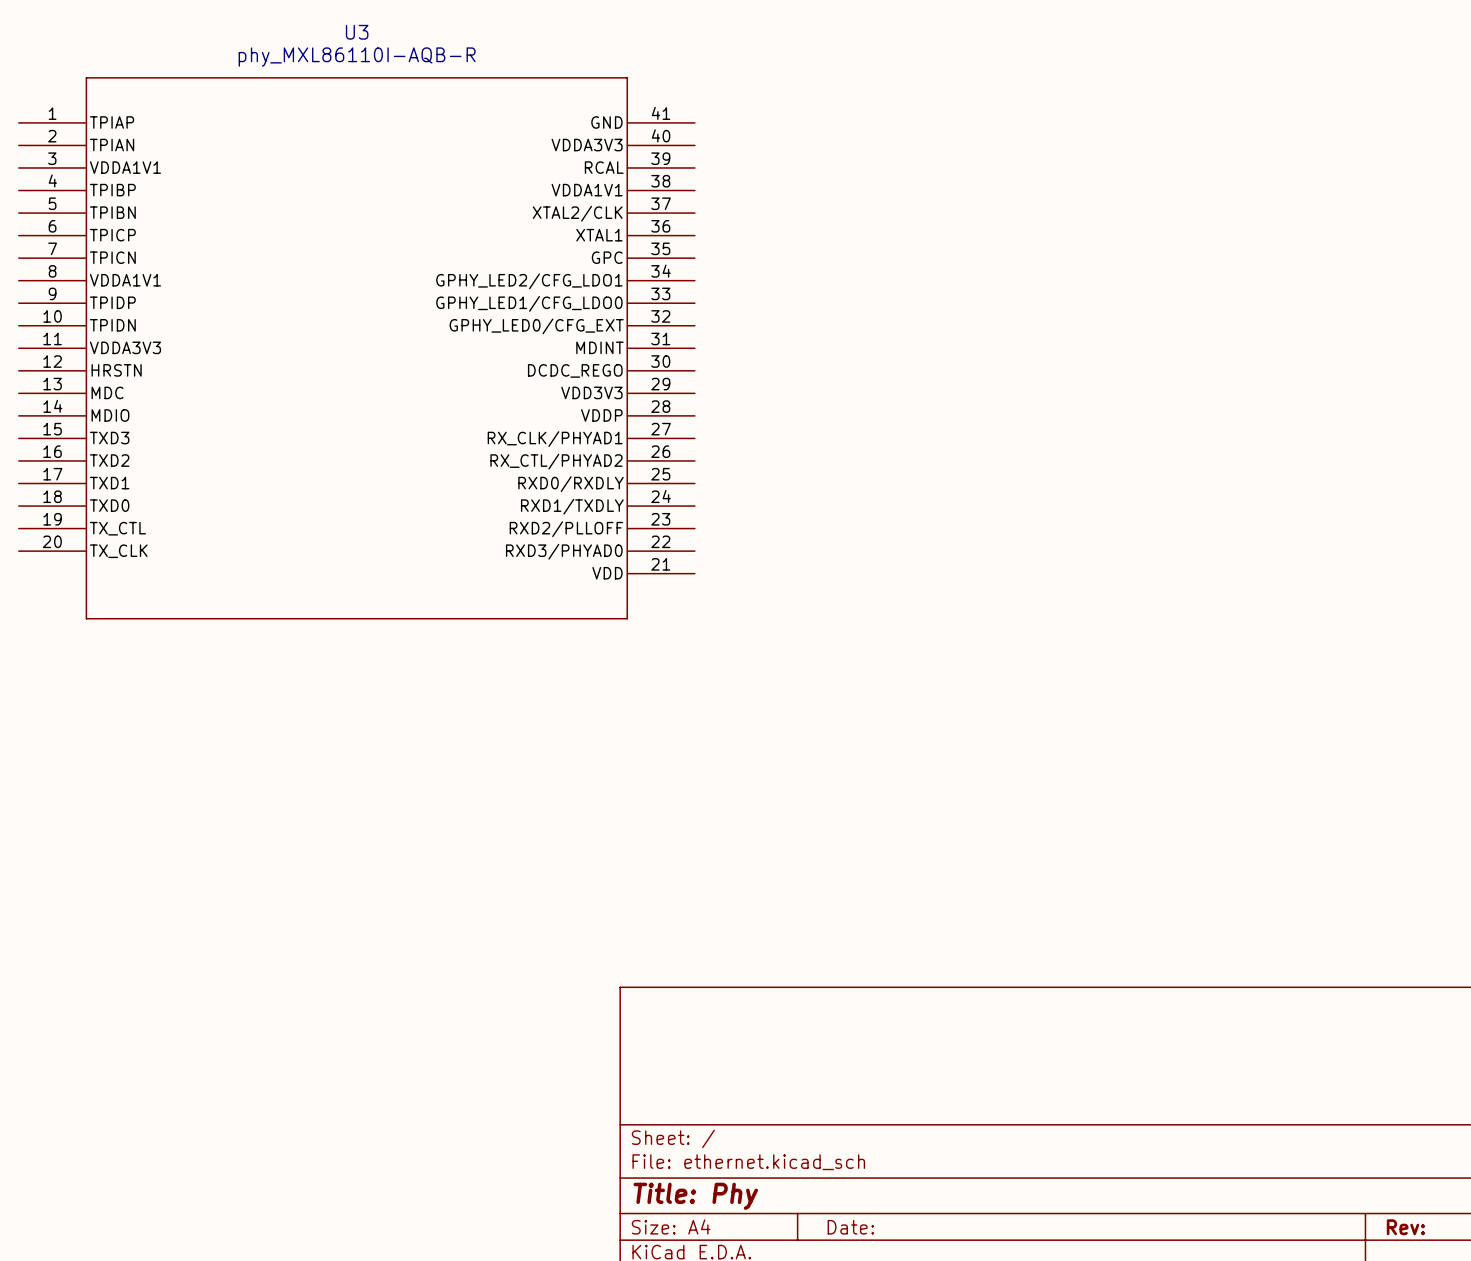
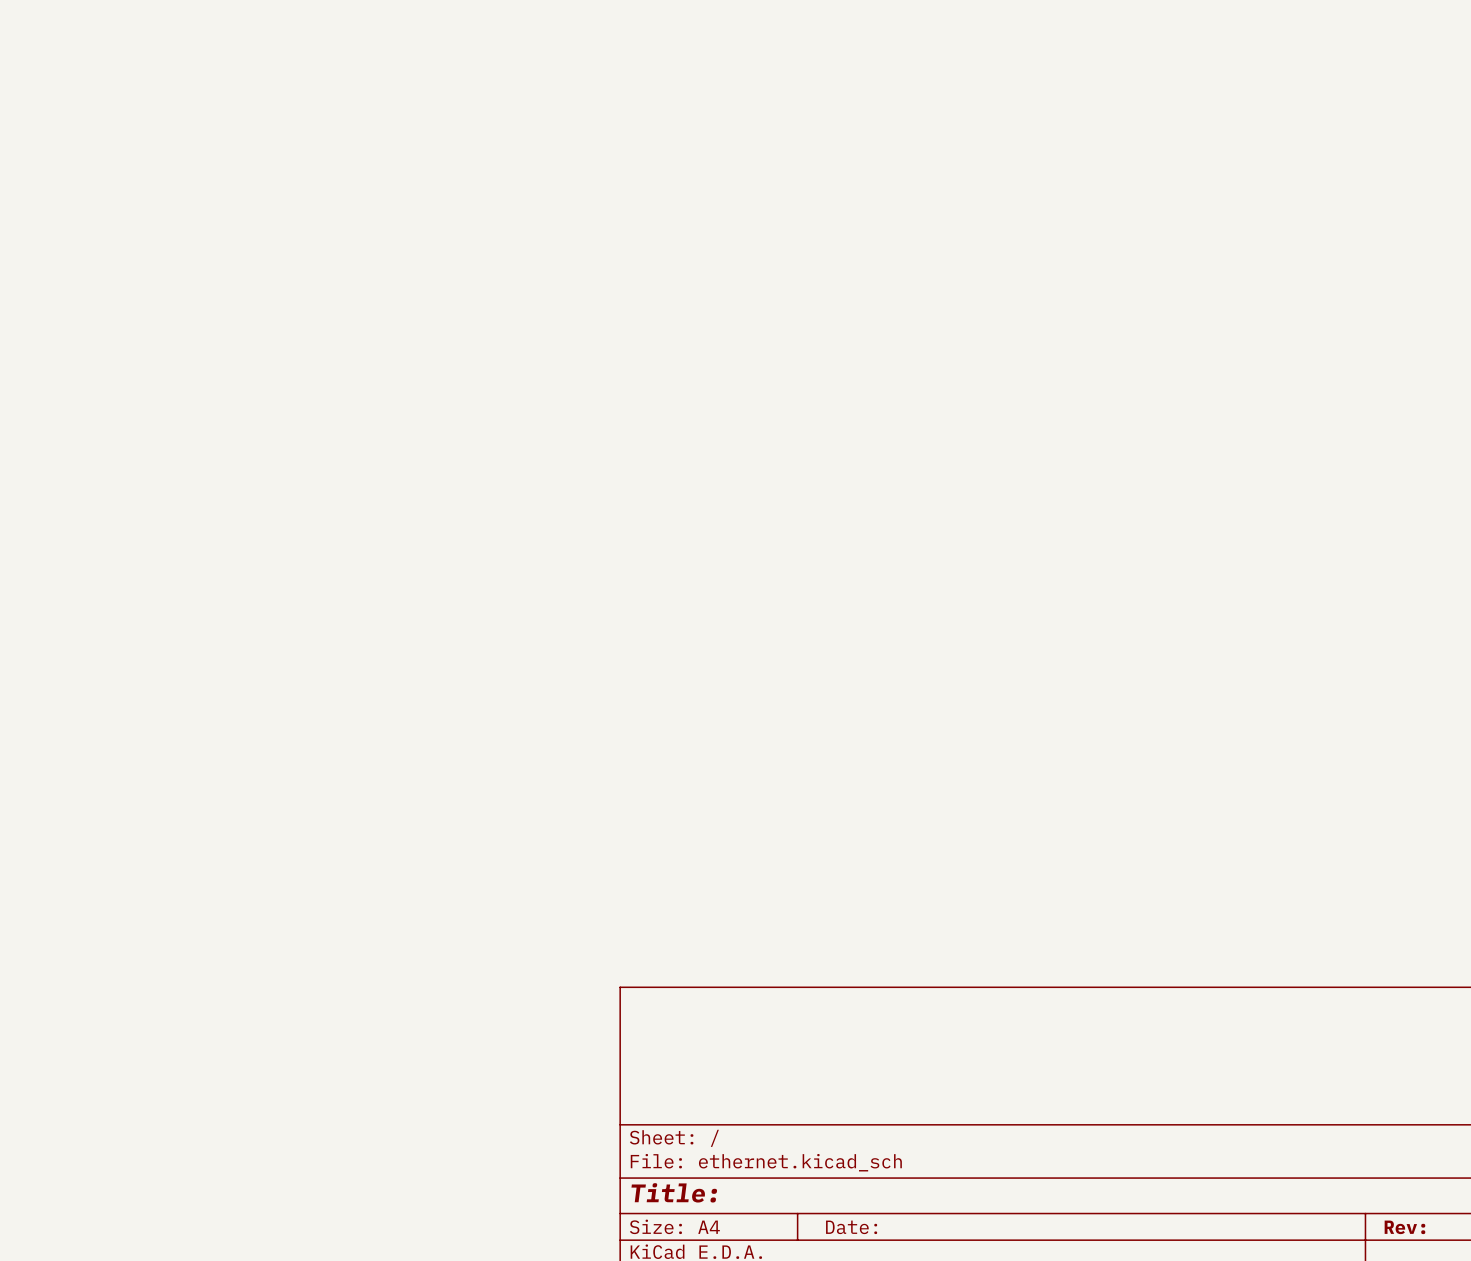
U3: phy_MXL86110I-AQB-R (356, 348) -> none
title block: Title: Phy (695, 1196) -> Title: (674, 1192)

